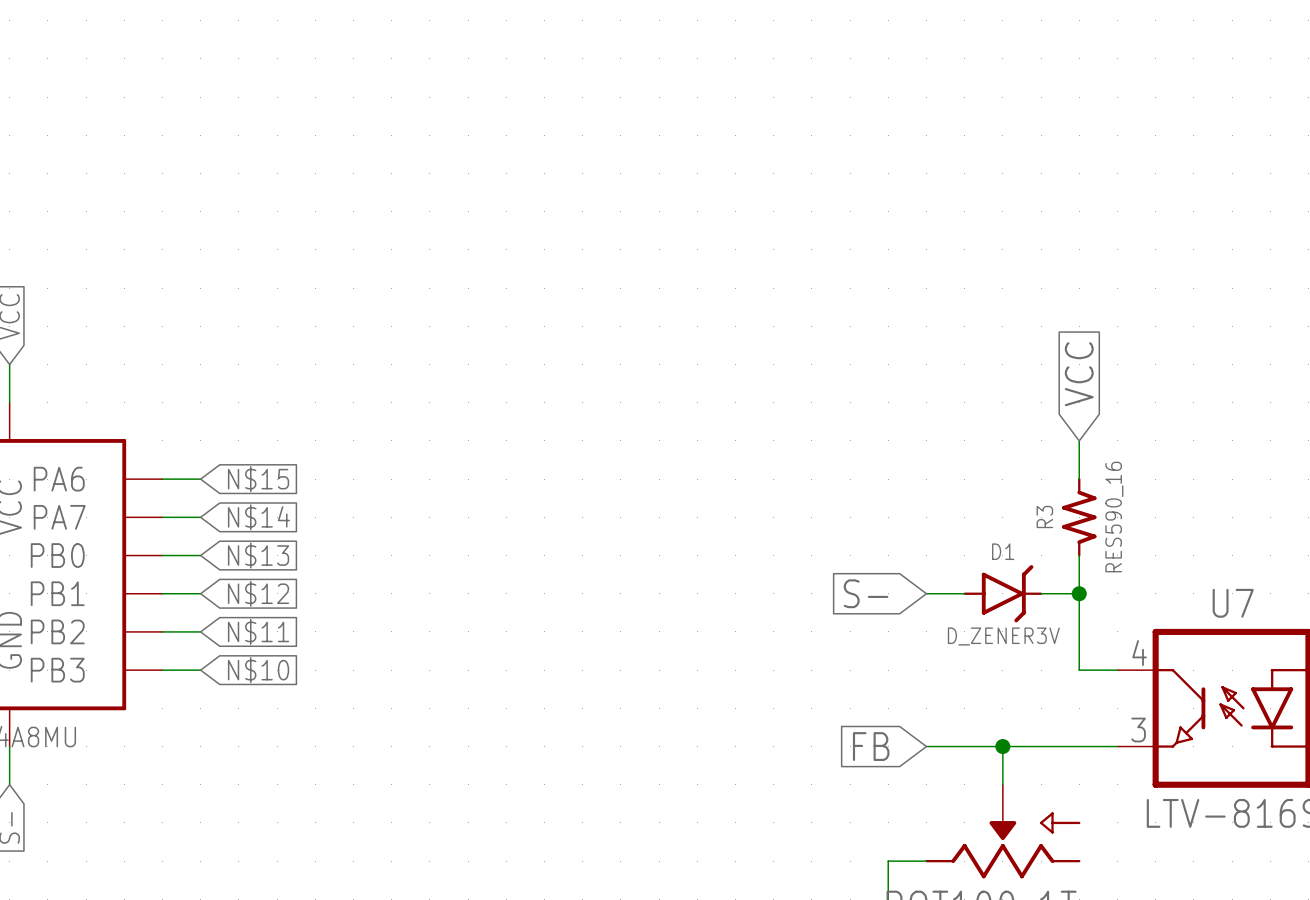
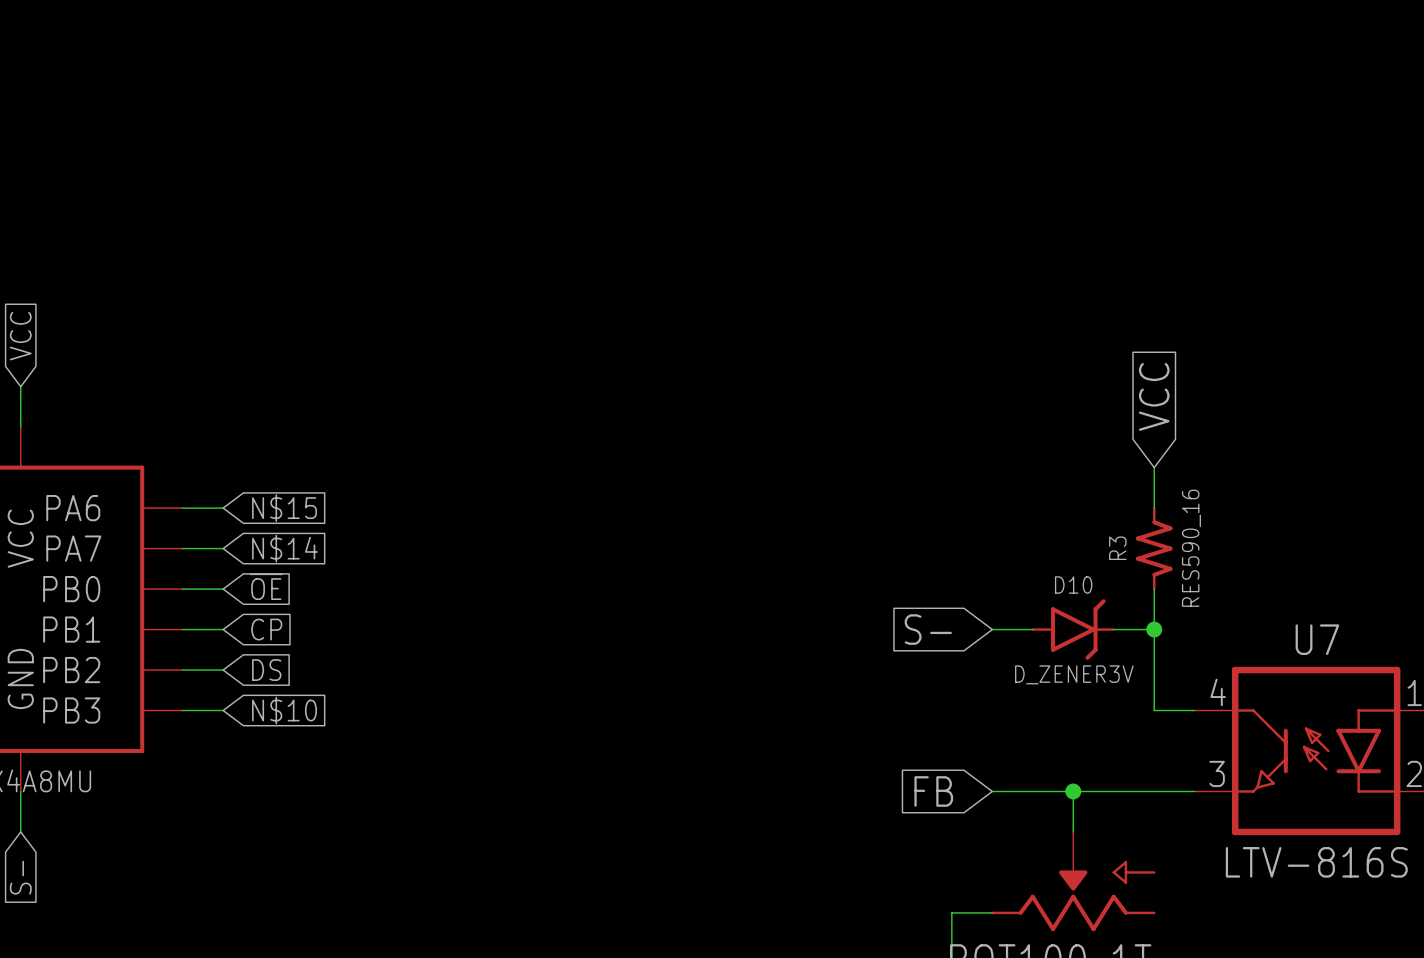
D1 name: D1 (1003, 551) -> D10 (1073, 585)
global label: N$13 (258, 555) -> ~{OE} (266, 586)
global label: N$12 (258, 593) -> CP (266, 629)
global label: N$11 (258, 631) -> DS (266, 670)

